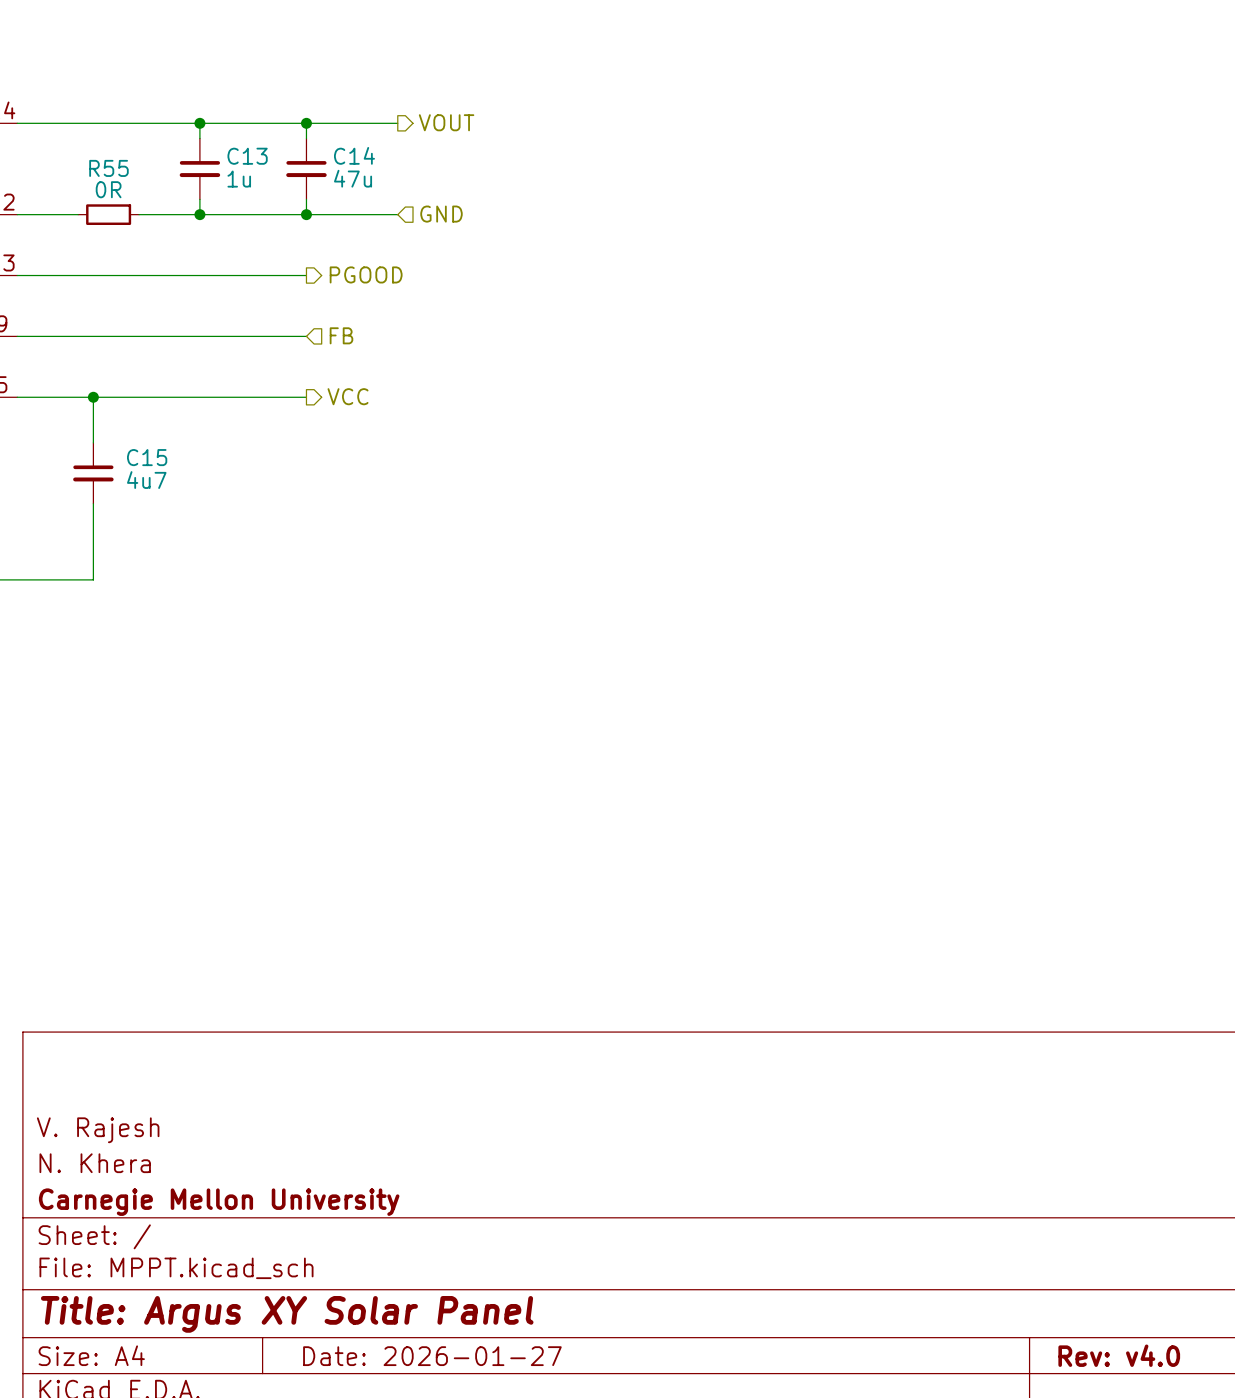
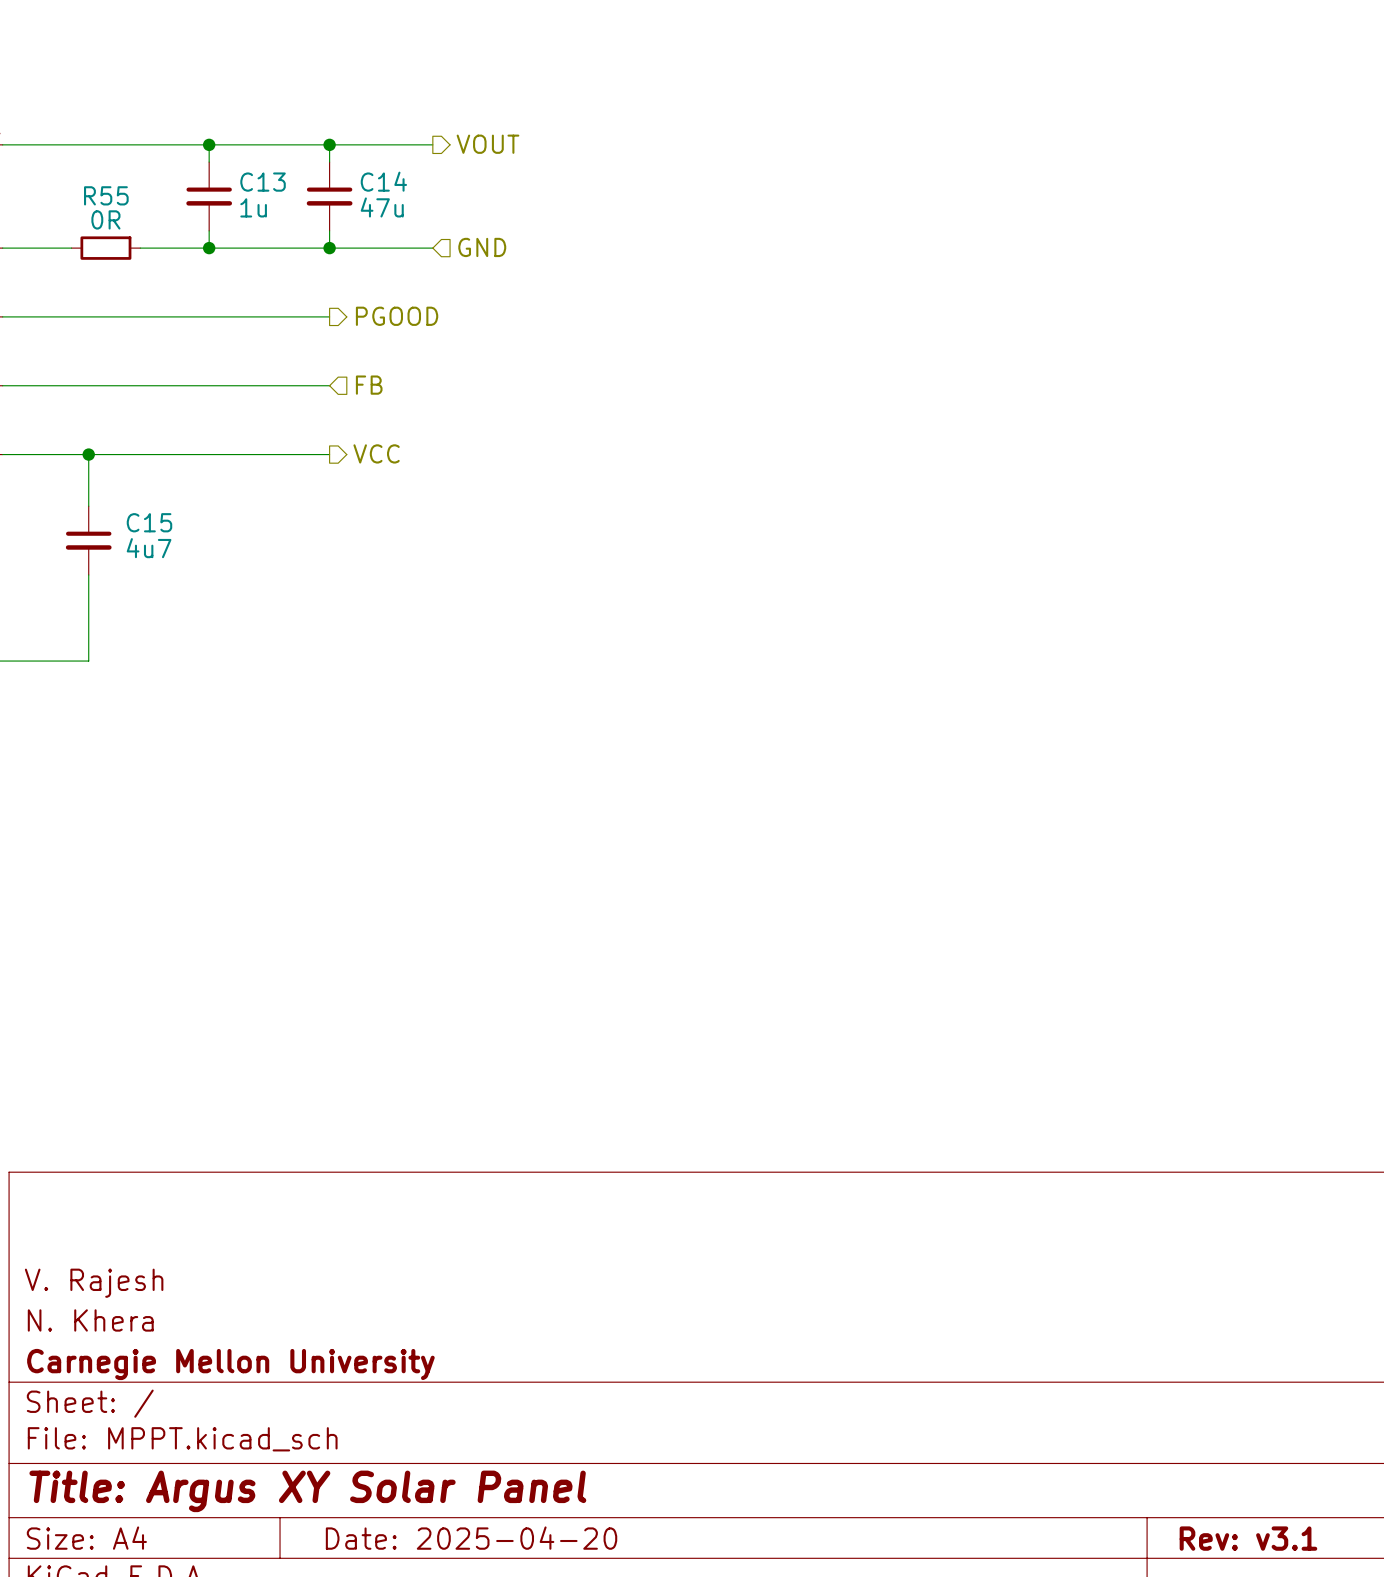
title block: Rev: v4.0 (1119, 1355) -> Rev: v3.1 (1248, 1538)
title block: Date: 2026-01-27 (432, 1356) -> Date: 2025-04-20 (471, 1538)

